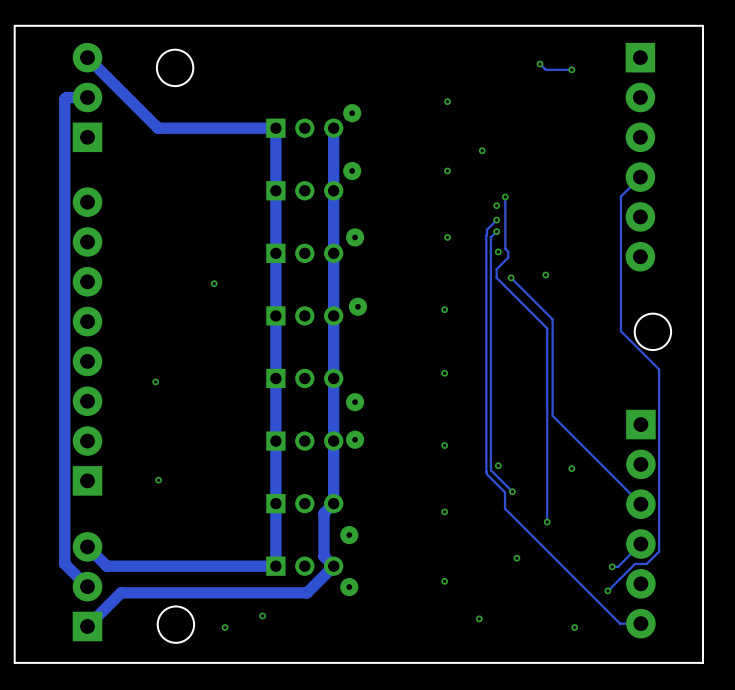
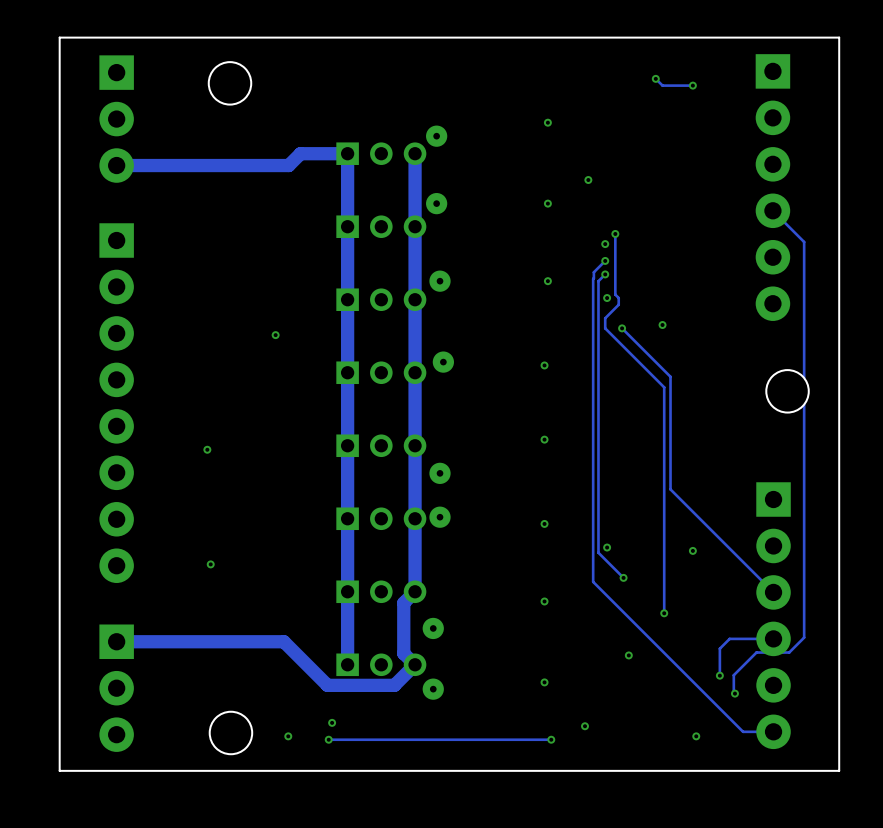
board edge: (702, 25) (14, 25) (14, 662) (702, 662) (702, 25) -> (839, 37) (839, 770) (59, 770) (59, 37) (839, 37)
track: (87, 57) (158, 128) (235, 128) -> (116, 165) (288, 165) (300, 153)
track: (87, 97) (66, 97) (64, 99) (64, 563) (87, 586) -> none
part rotation: 0° (87, 97) -> 180° (116, 119)
track: (640, 177) (620, 196) (620, 331) (659, 369) (659, 551) (646, 563) (635, 563) (607, 590) -> (772, 210) (804, 242) (804, 637) (789, 652) (756, 652) (733, 675) (733, 694)
part rotation: 0° (87, 341) -> 180° (116, 403)
track: (486, 472) (505, 492) (505, 508) (620, 623) -> (593, 554) (593, 581) (743, 731) (749, 731)
track: (640, 544) (618, 566) (612, 566) -> (773, 638) (729, 638) (719, 648) (719, 675)
track: (87, 546) (106, 566) (275, 566) -> none
via position: (612, 566) -> (719, 675)
track: (316, 583) (307, 592) (121, 592) (87, 626) -> (394, 685) (327, 685) (283, 641) (116, 641)
part rotation: 0° (87, 586) -> 180° (116, 688)
via: none -> (328, 739)
track: none -> (551, 739) (328, 739)
via: none -> (551, 739)

